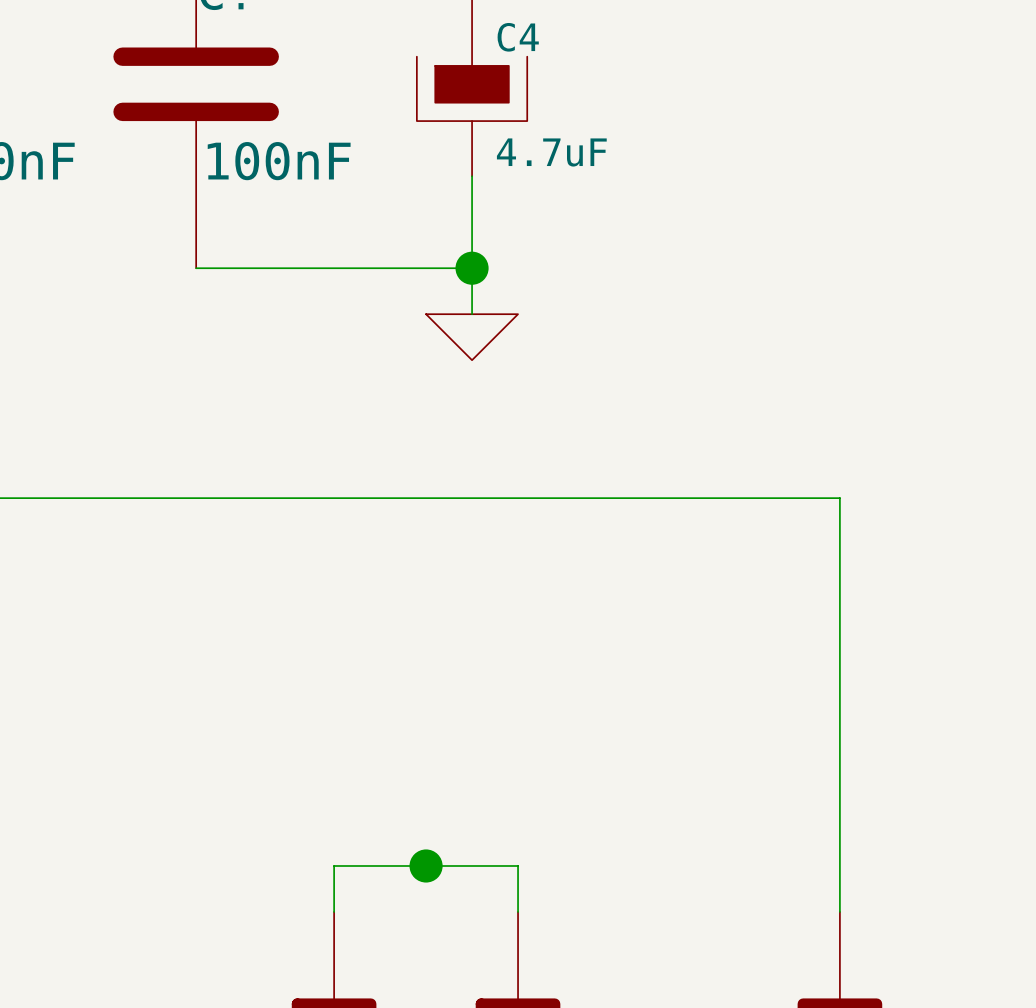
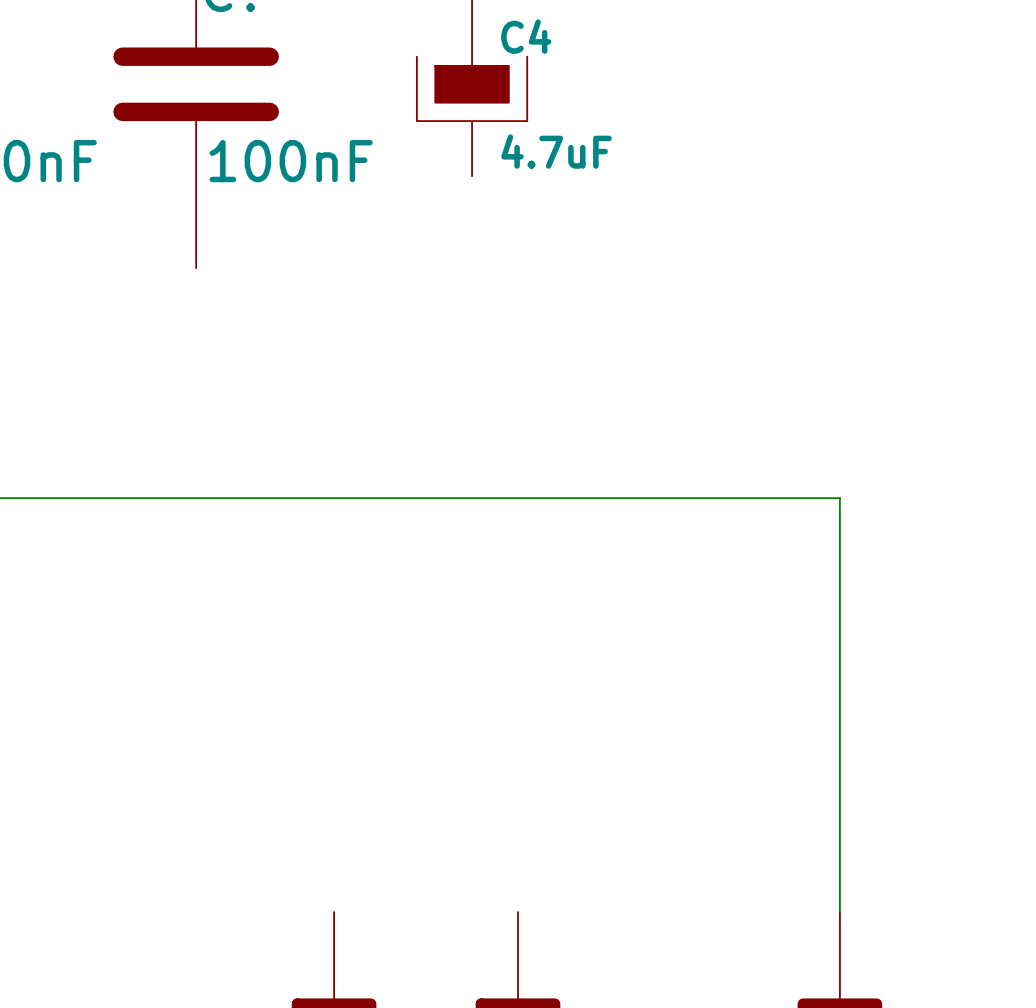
wire: (472, 176) (472, 314) -> none
wire: (196, 268) (472, 268) -> none
junction: (472, 268) -> none
power symbol: (472, 337) -> none
junction: (426, 865) -> none
wire: (334, 911) (334, 865) (518, 865) (518, 911) -> none

